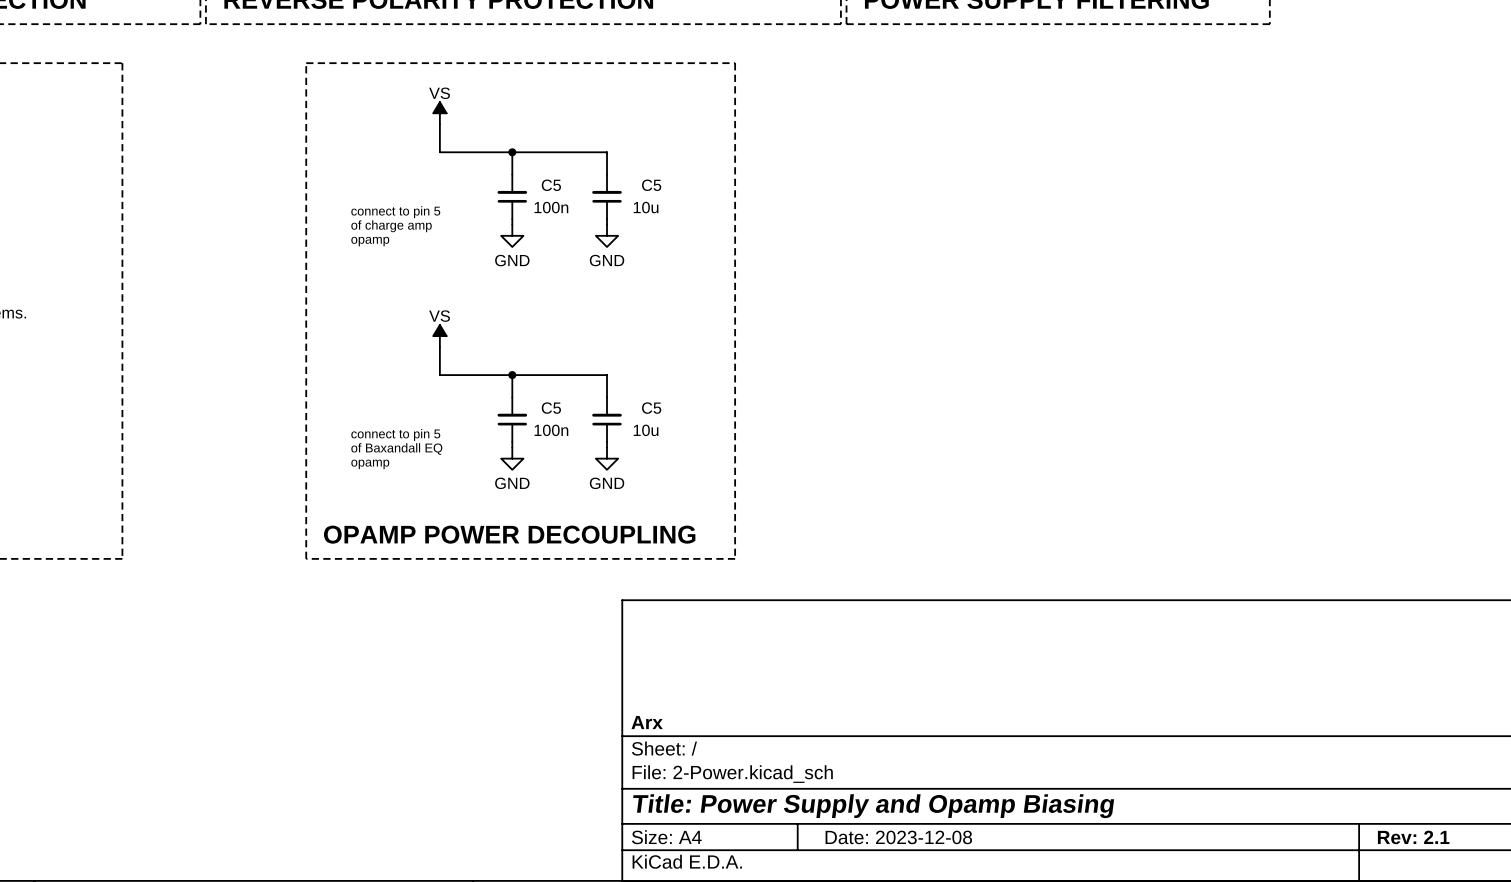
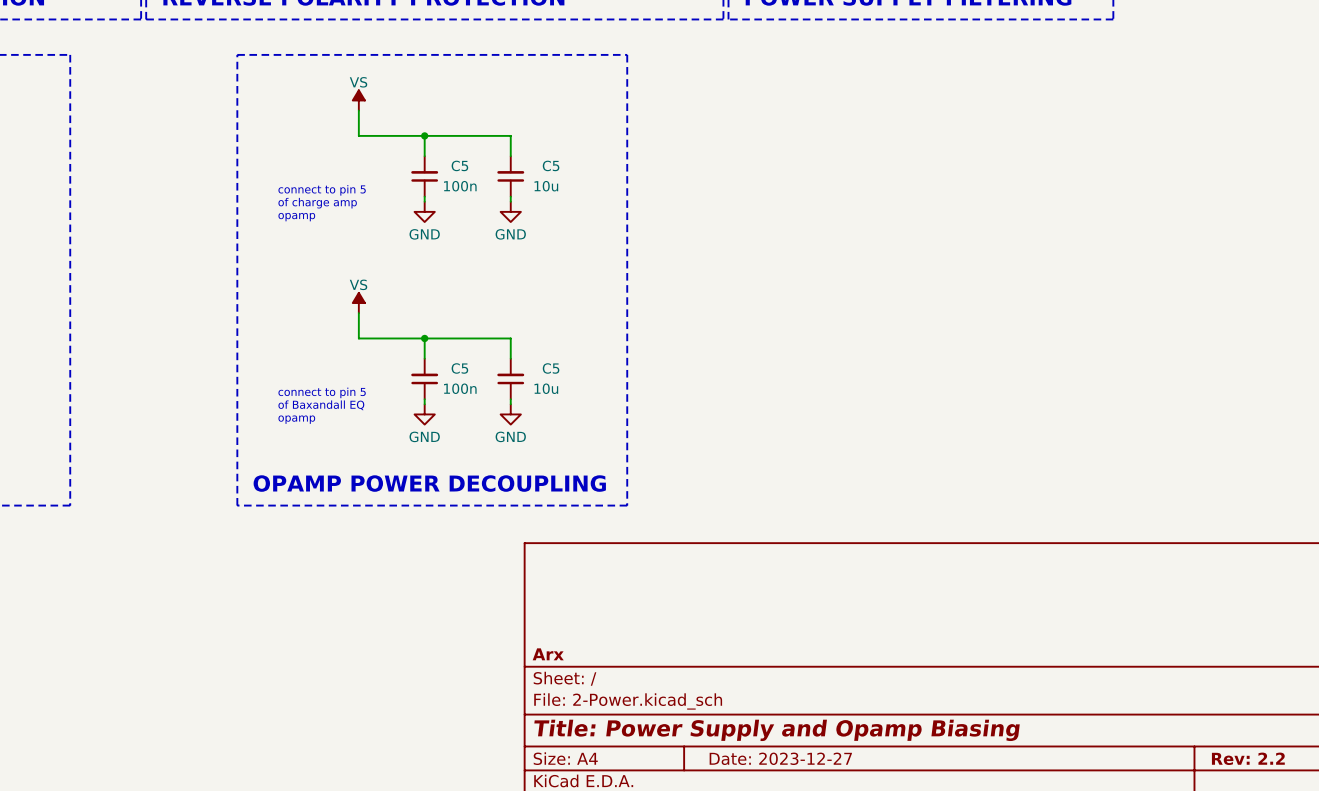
title block: Date: 2023-12-08 (898, 837) -> Date: 2023-12-27 (780, 758)
title block: Rev: 2.1 (1413, 837) -> Rev: 2.2 (1248, 758)

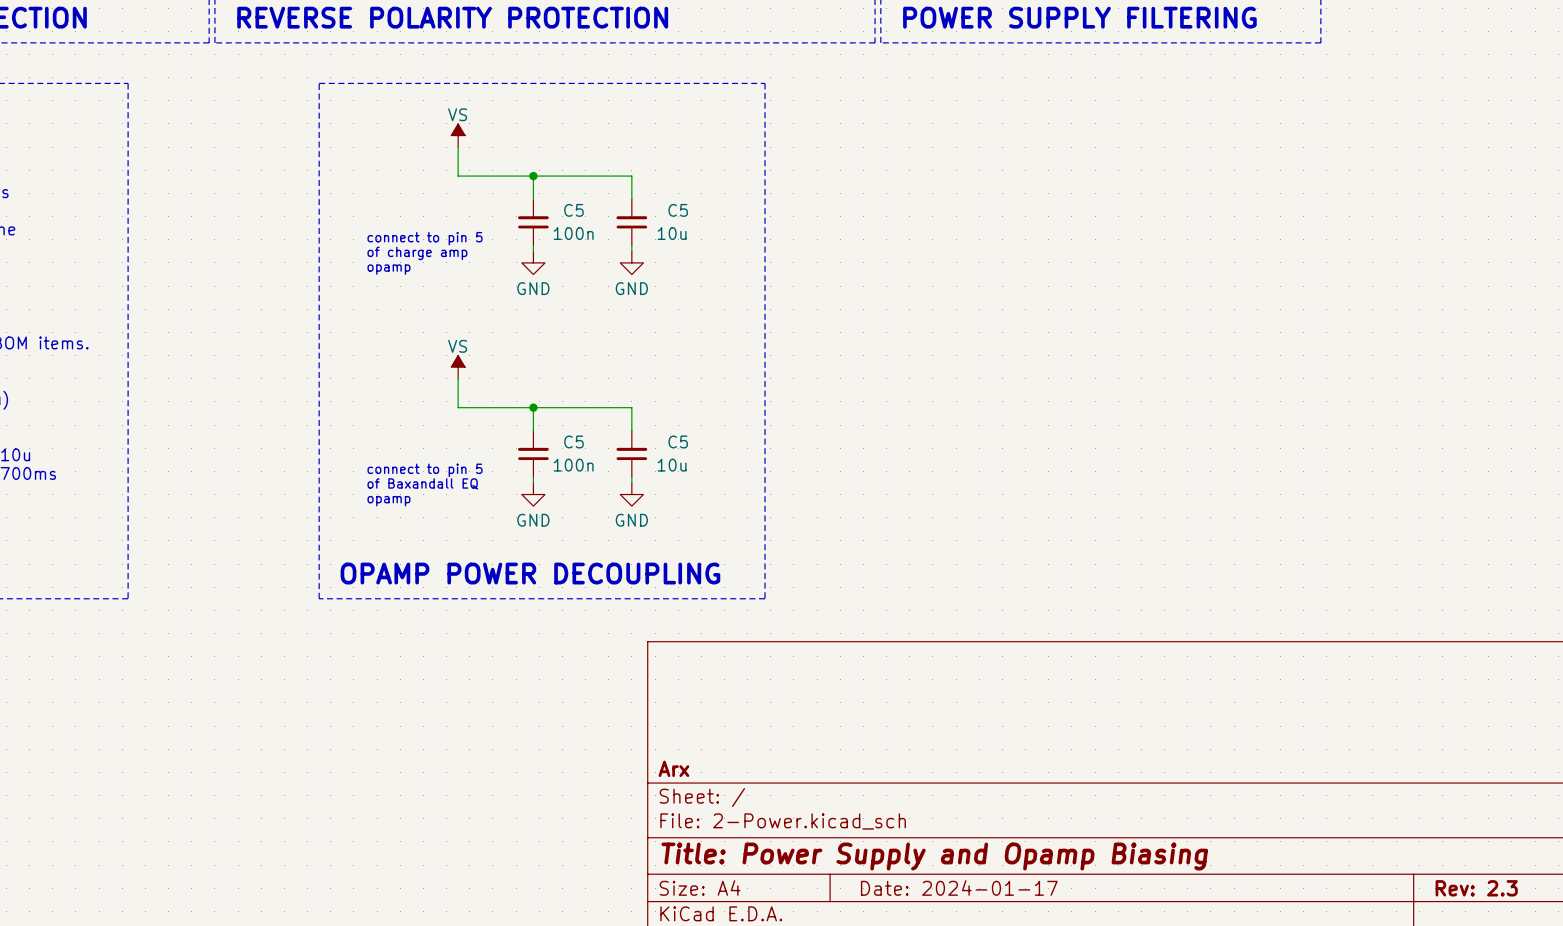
title block: Date: 2023-12-27 (780, 758) -> Date: 2024-01-17 (959, 887)
title block: Rev: 2.2 (1248, 758) -> Rev: 2.3 (1476, 888)

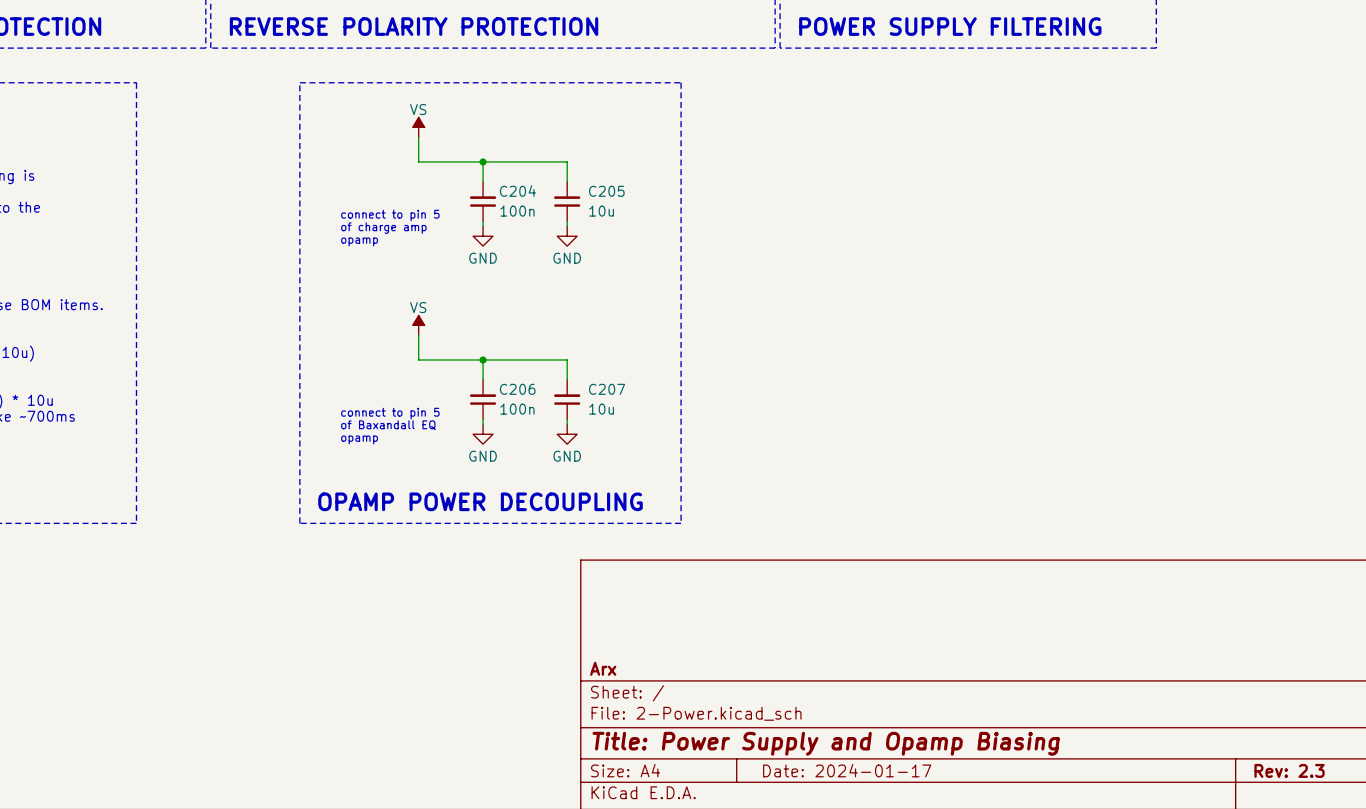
C5 name: C5 (573, 210) -> C204 (517, 191)
C5 name: C5 (678, 210) -> C205 (606, 191)
C5 name: C5 (573, 441) -> C206 (517, 389)
C5 name: C5 (678, 441) -> C207 (607, 389)

